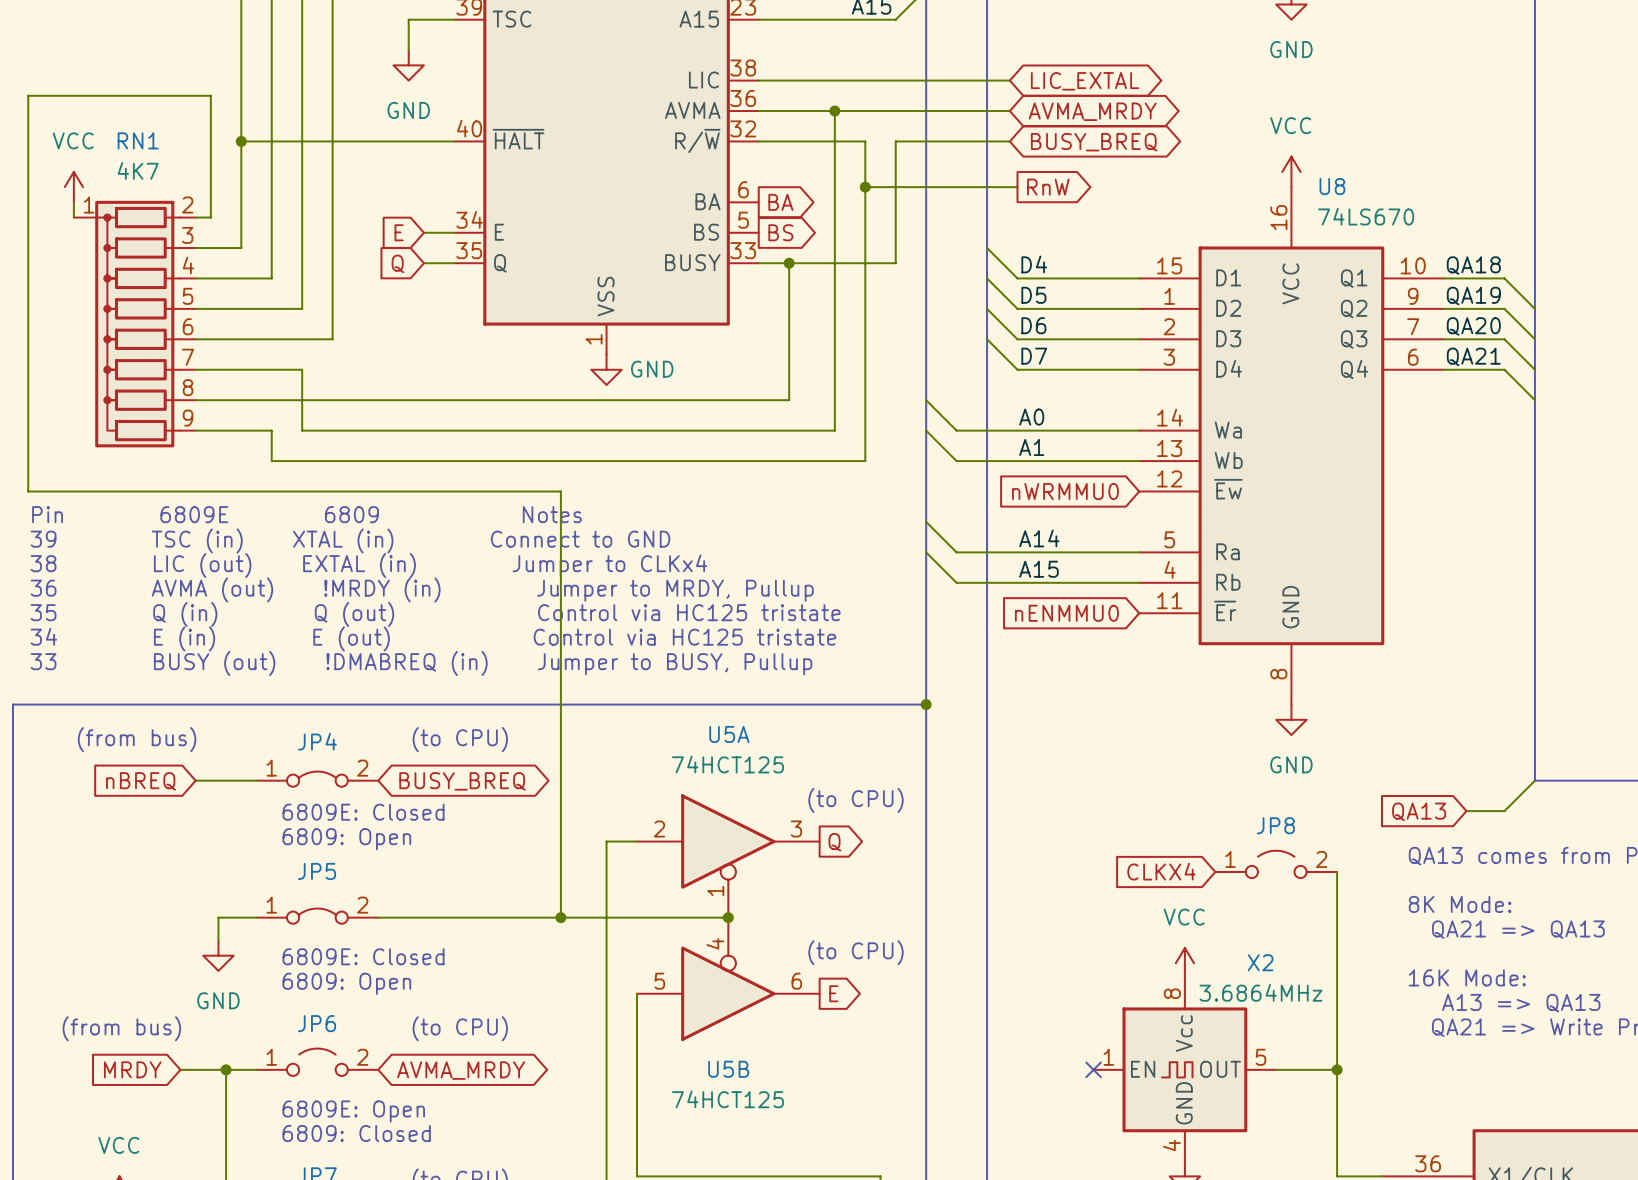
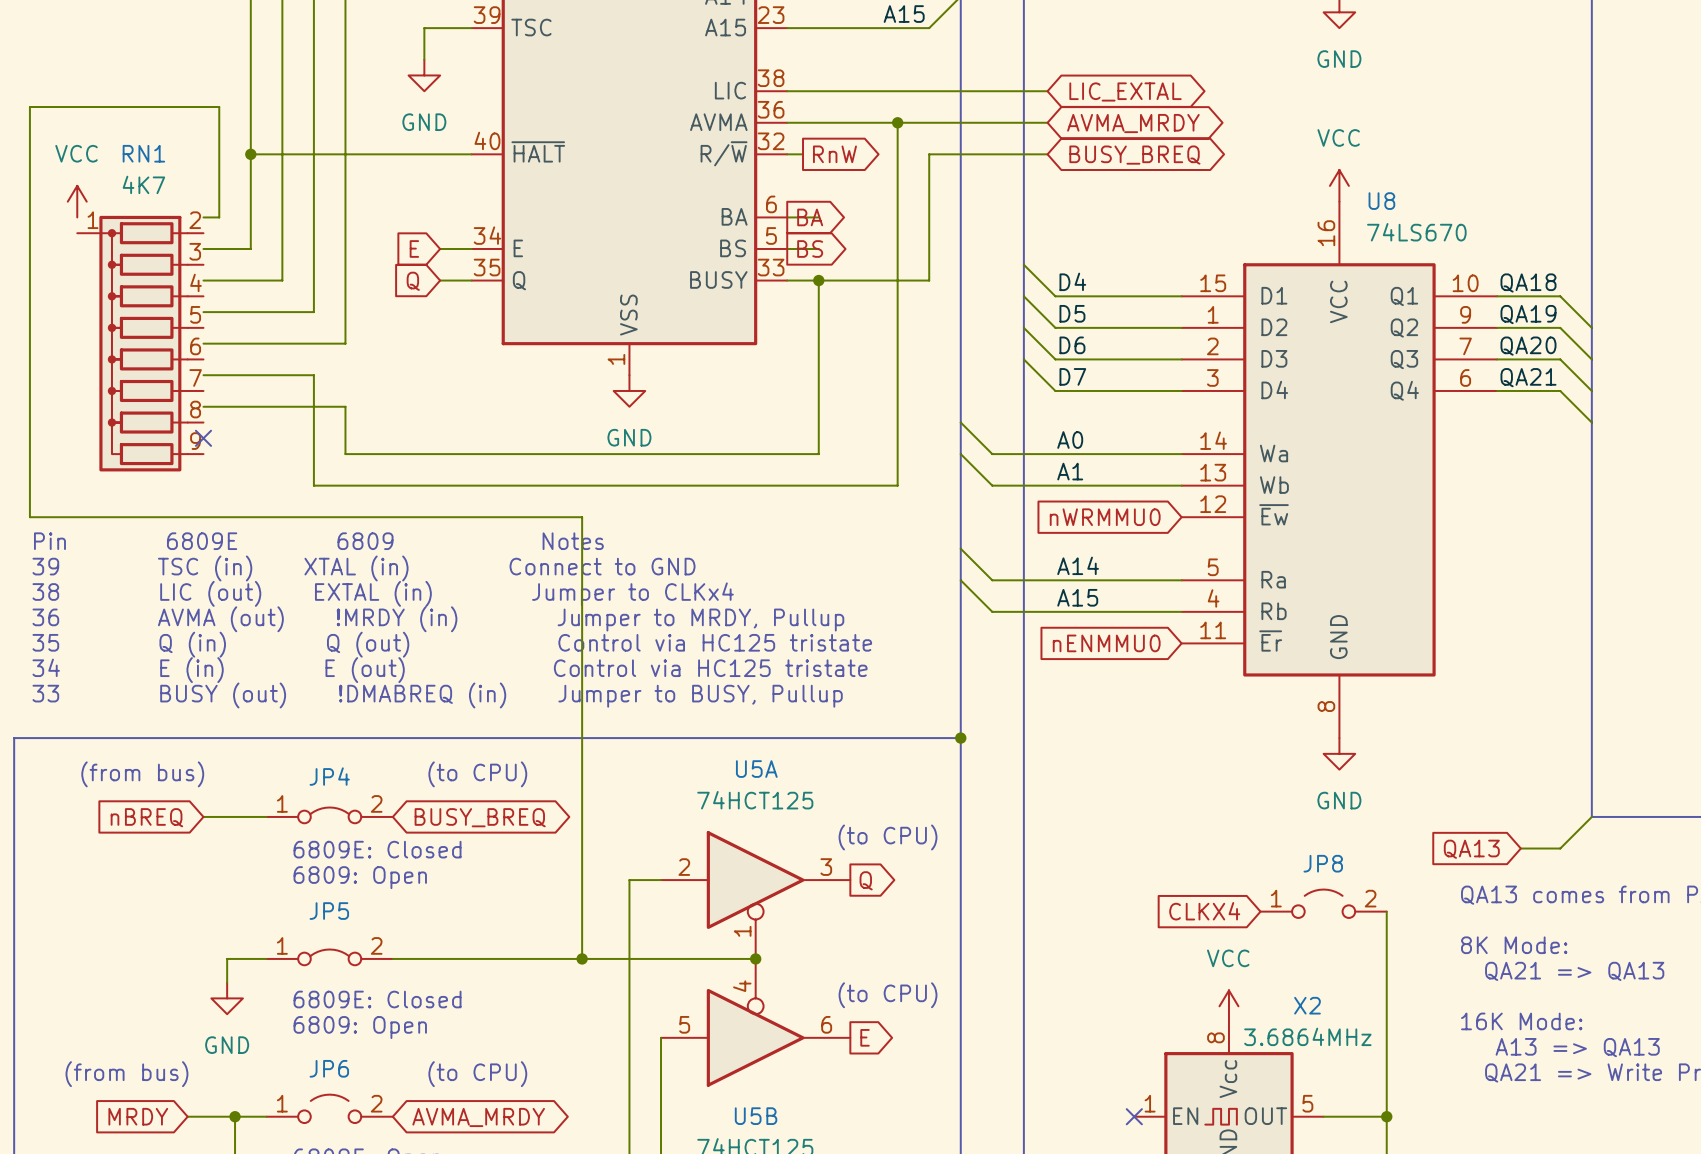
wire: (834, 111) (834, 430) (789, 430) -> (818, 422) (818, 454)
junction position: (834, 111) -> (897, 122)
wire: (773, 141) (865, 141) -> (897, 122) (897, 154)
wire: (865, 187) (1017, 187) -> none
junction: (865, 187) -> none
global label position: RnW (1048, 187) -> RnW (834, 154)
wire: (73, 202) (73, 217) -> none
wire: (210, 202) (210, 217) (195, 217) -> (219, 217) (203, 217)
wire: none -> (787, 217) (818, 217)
wire: (241, 232) (241, 248) (195, 248) -> (250, 248) (203, 248)
wire: none -> (787, 248) (818, 248)
wire: (271, 263) (271, 278) (195, 278) -> (282, 280) (203, 280)
wire: (302, 293) (302, 308) (195, 308) -> (313, 312) (203, 312)
wire: (332, 324) (332, 339) (195, 339) -> (345, 343) (203, 343)
wire: (195, 369) (302, 369) -> (203, 375) (313, 375) (313, 390)
power symbol text position: GND (652, 369) -> GND (629, 437)
wire: none -> (203, 406) (345, 406) (345, 454)
wire: (195, 400) (789, 400) -> none
no-connect mark: none -> (203, 438)
wire: (195, 430) (271, 430) (271, 461) (302, 461) -> none
wire: (302, 430) (332, 430) -> (313, 454) (313, 485)

